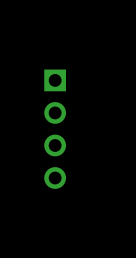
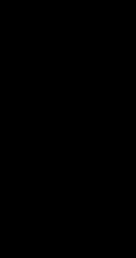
part: (55, 129) -> none

